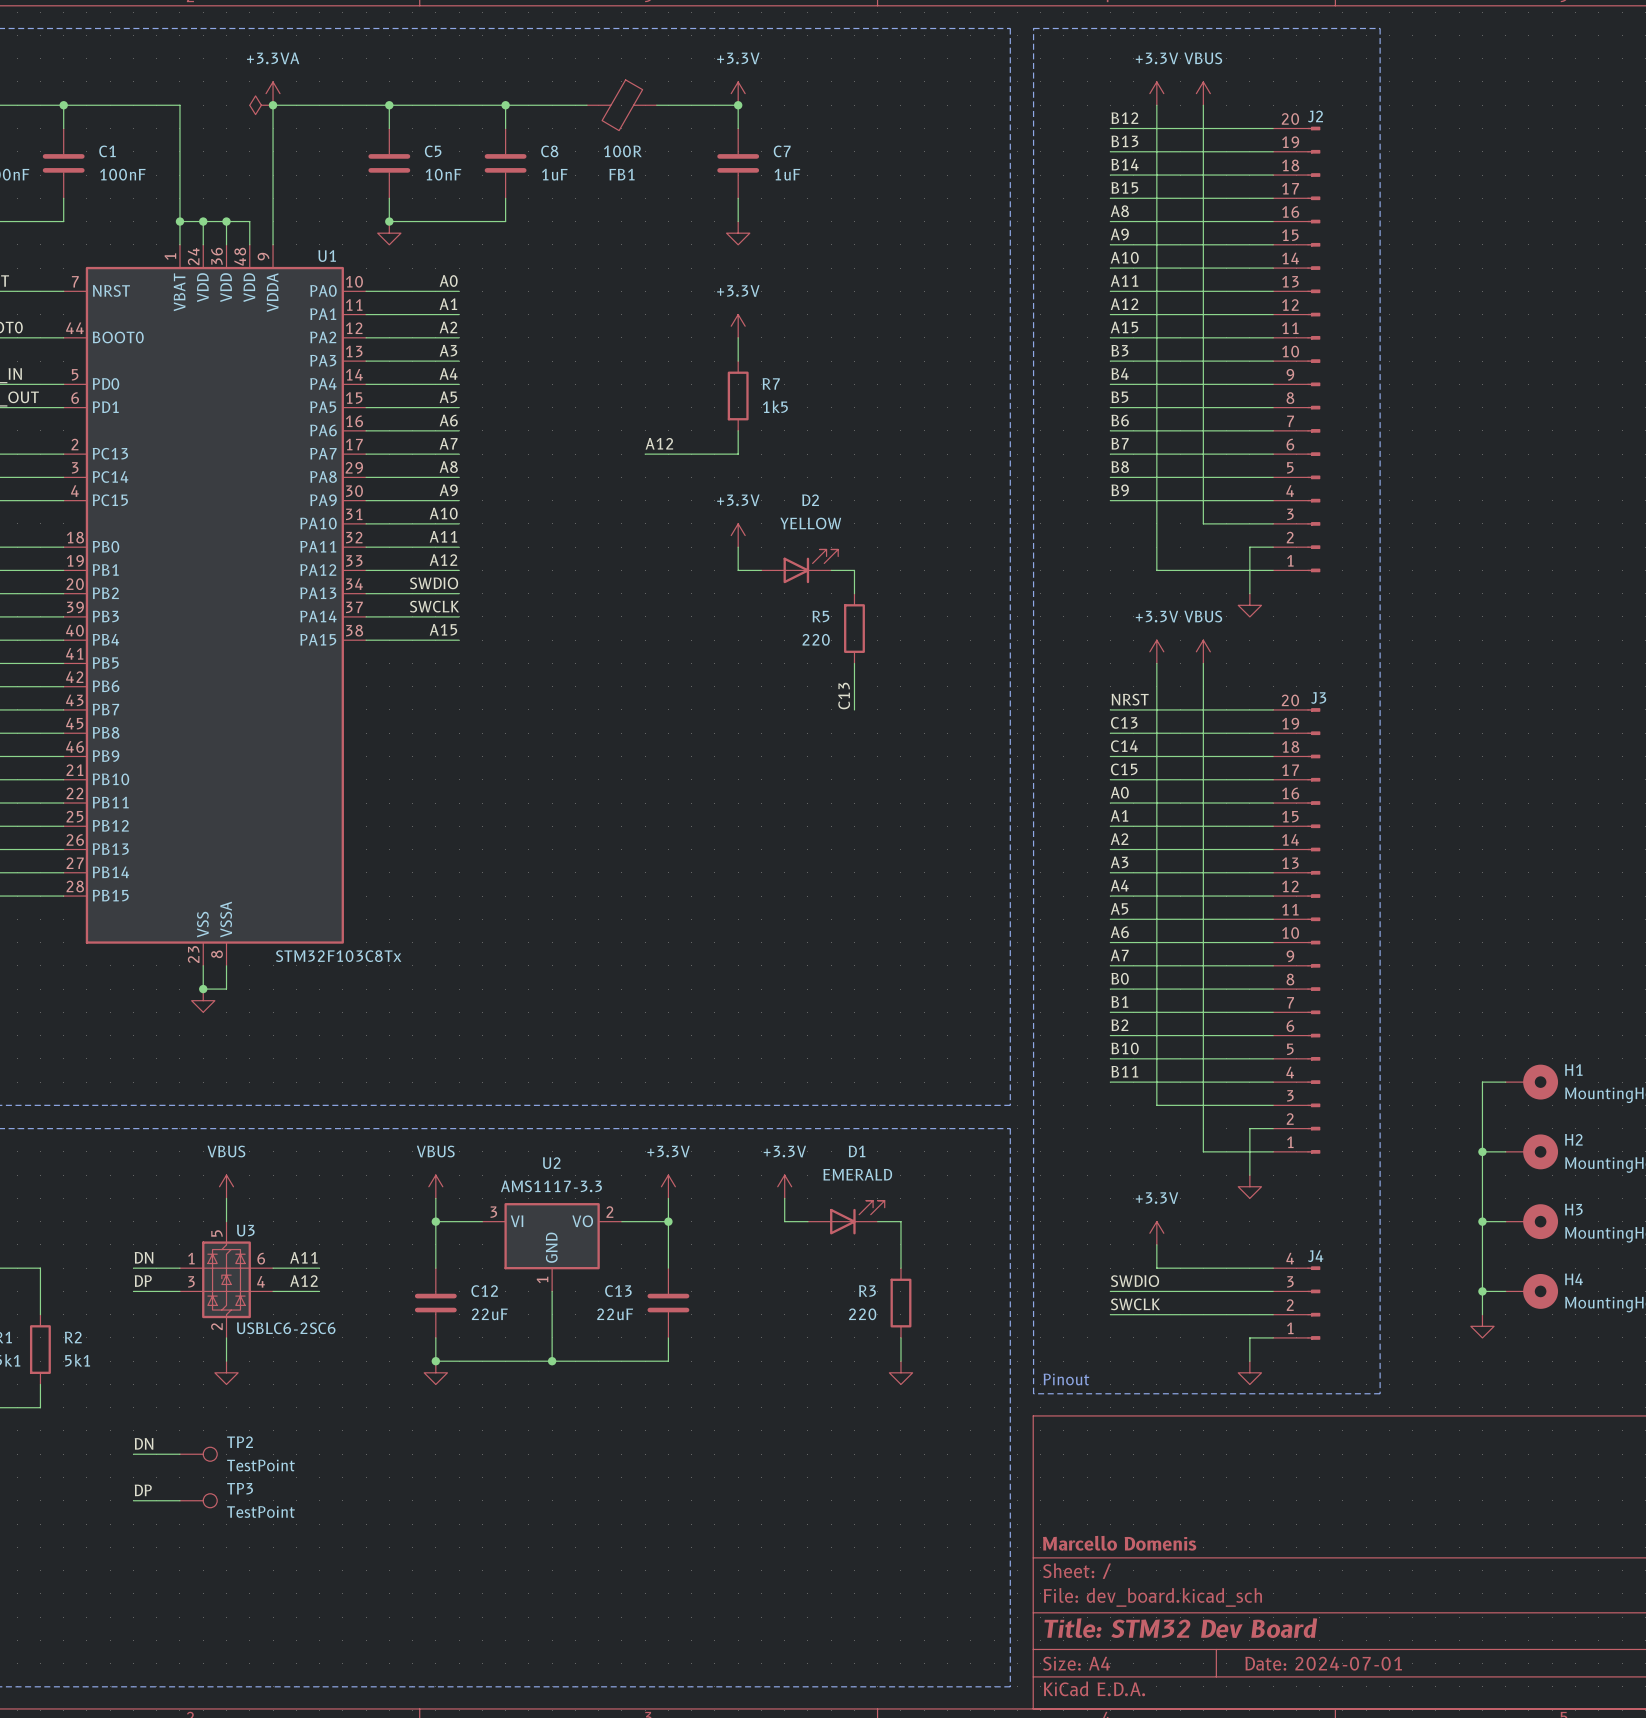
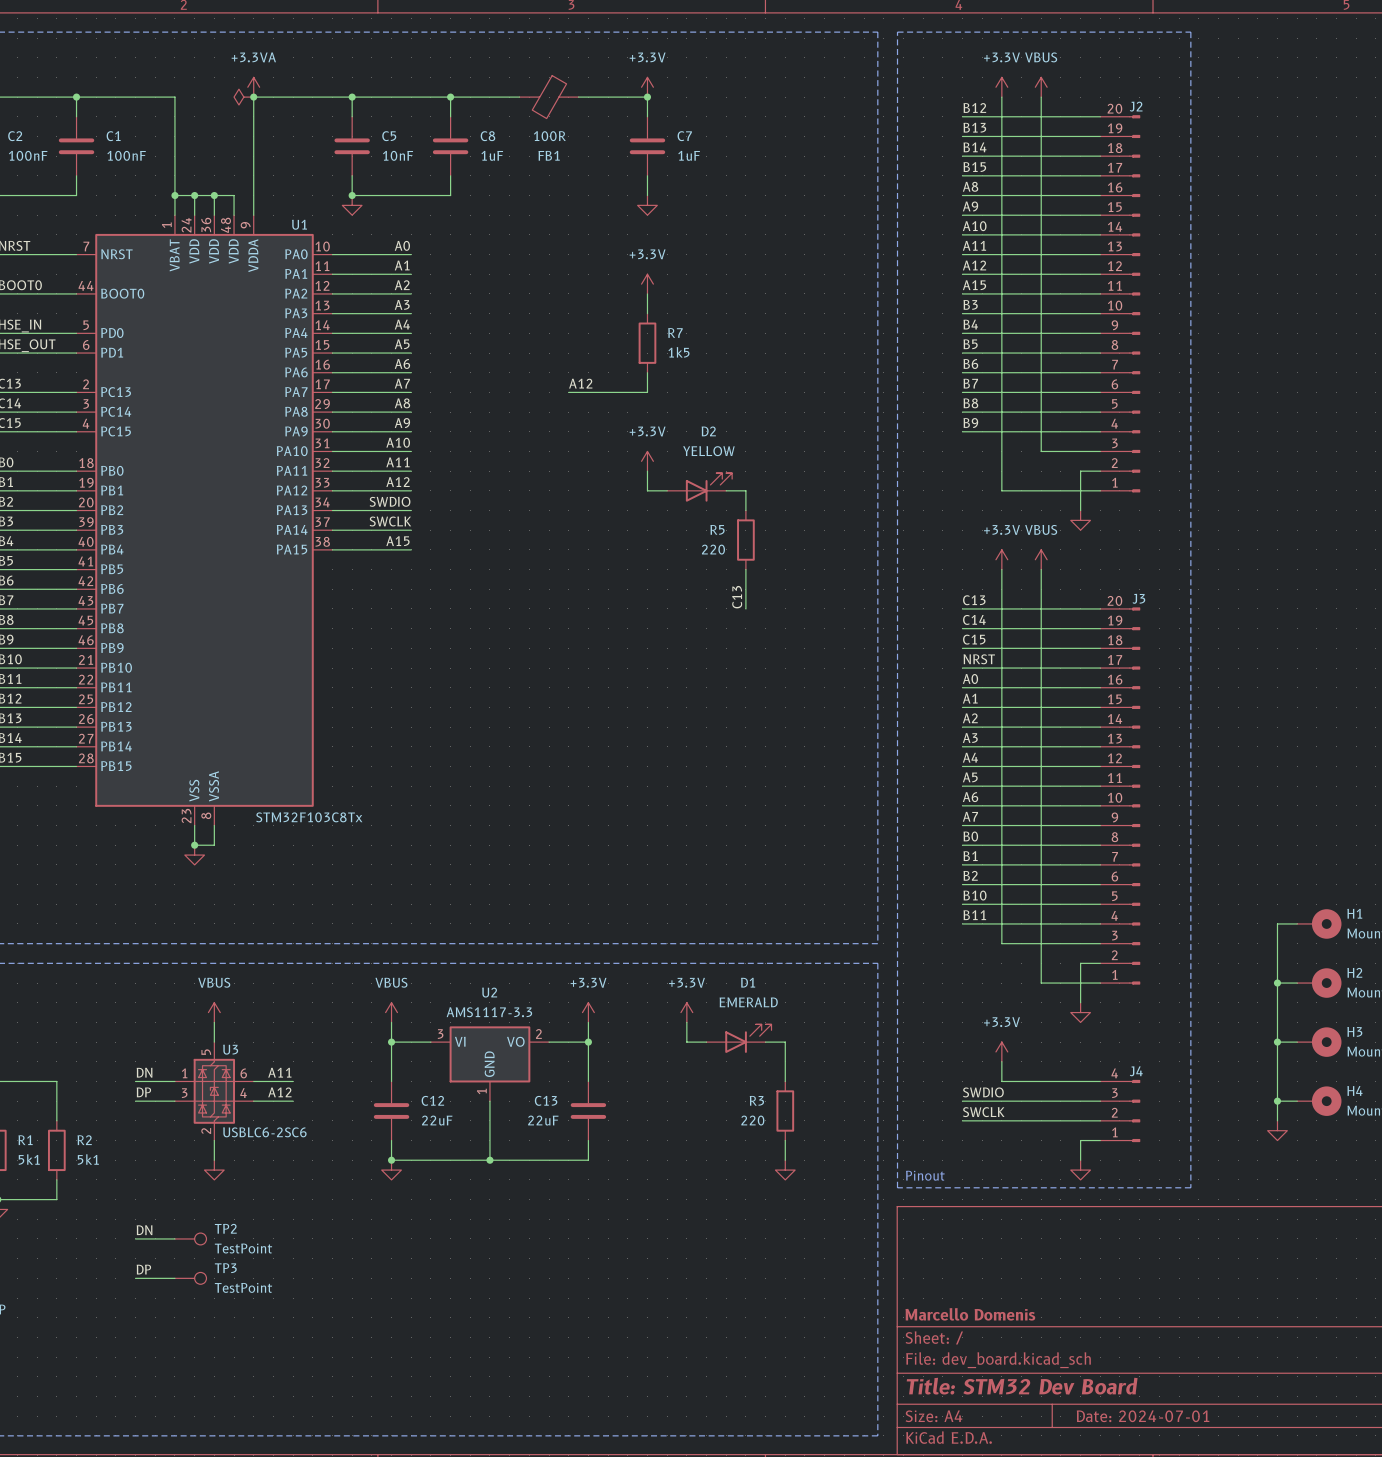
label: NRST (1130, 699) -> C13 (974, 600)
label: C13 (1124, 722) -> C14 (974, 619)
label: C14 (1124, 746) -> C15 (974, 639)
label: C15 (1124, 769) -> NRST (979, 659)

